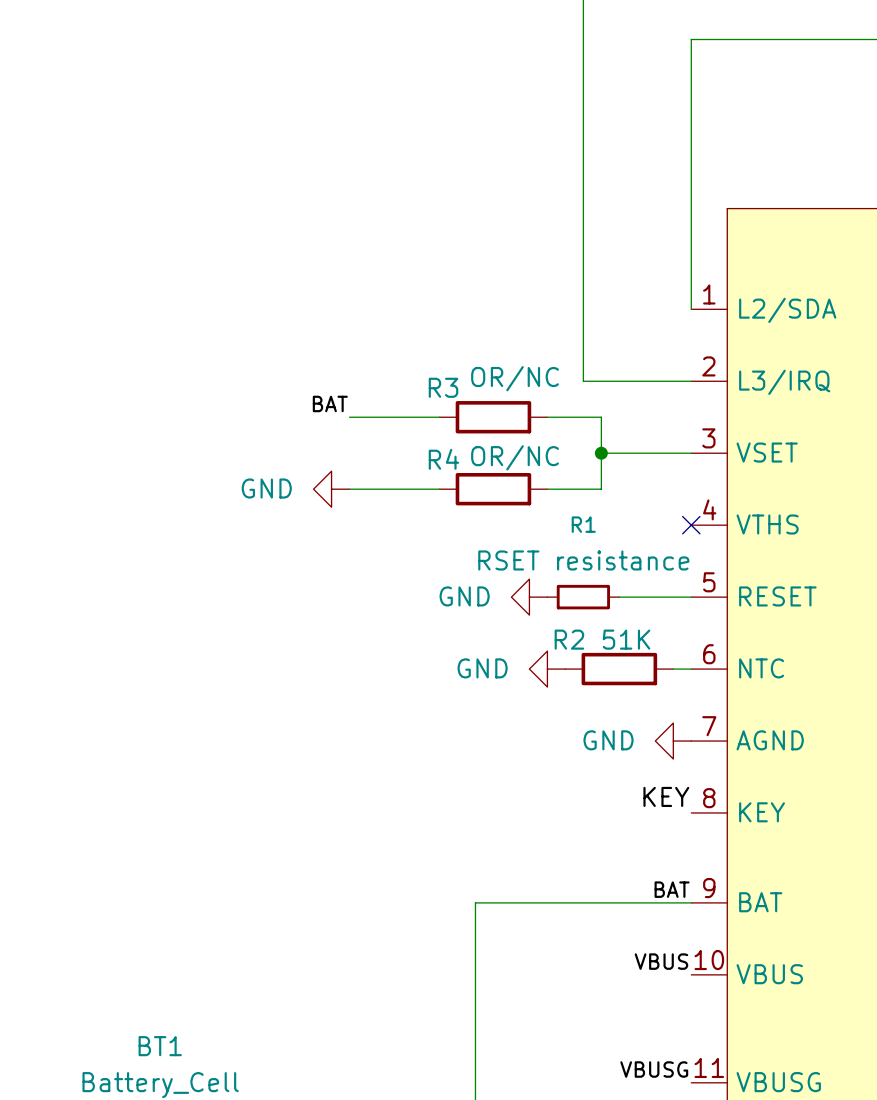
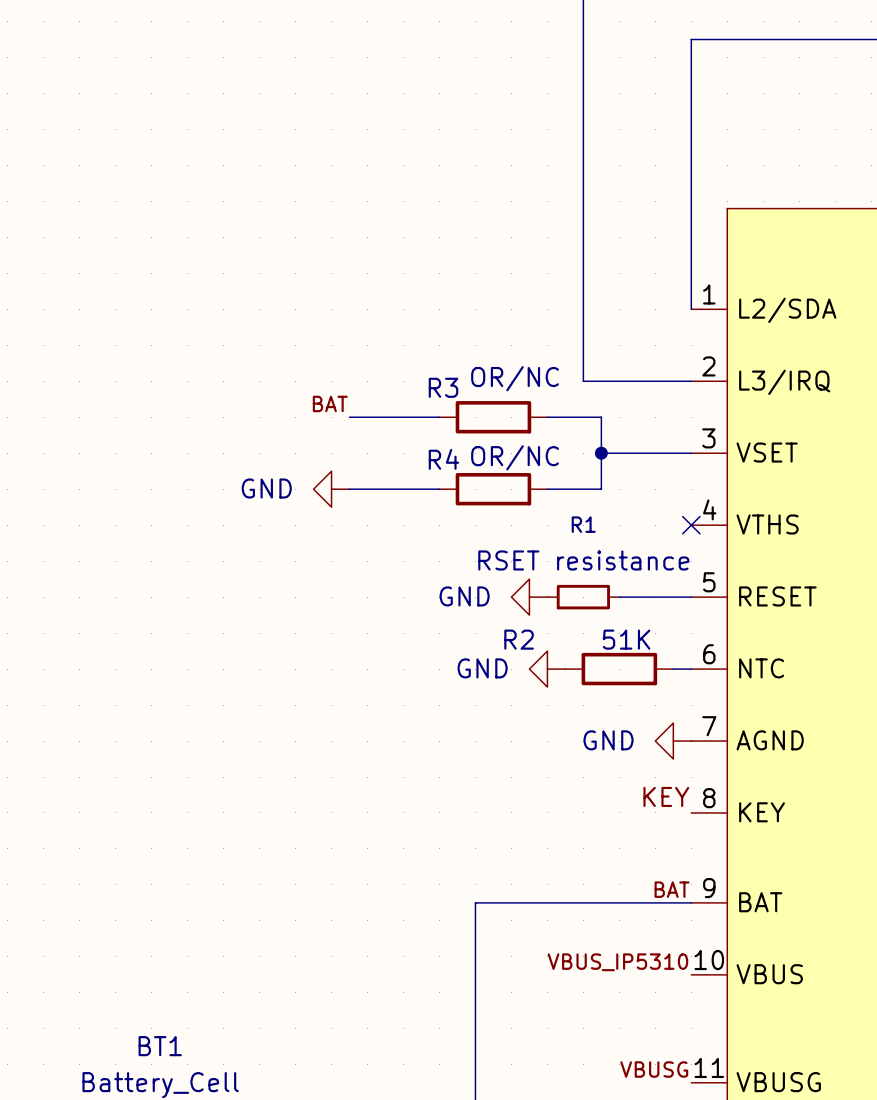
R2 name position: R2 (569, 639) -> R2 (519, 639)
label: VBUS (661, 961) -> VBUS_IP5310 (617, 962)

